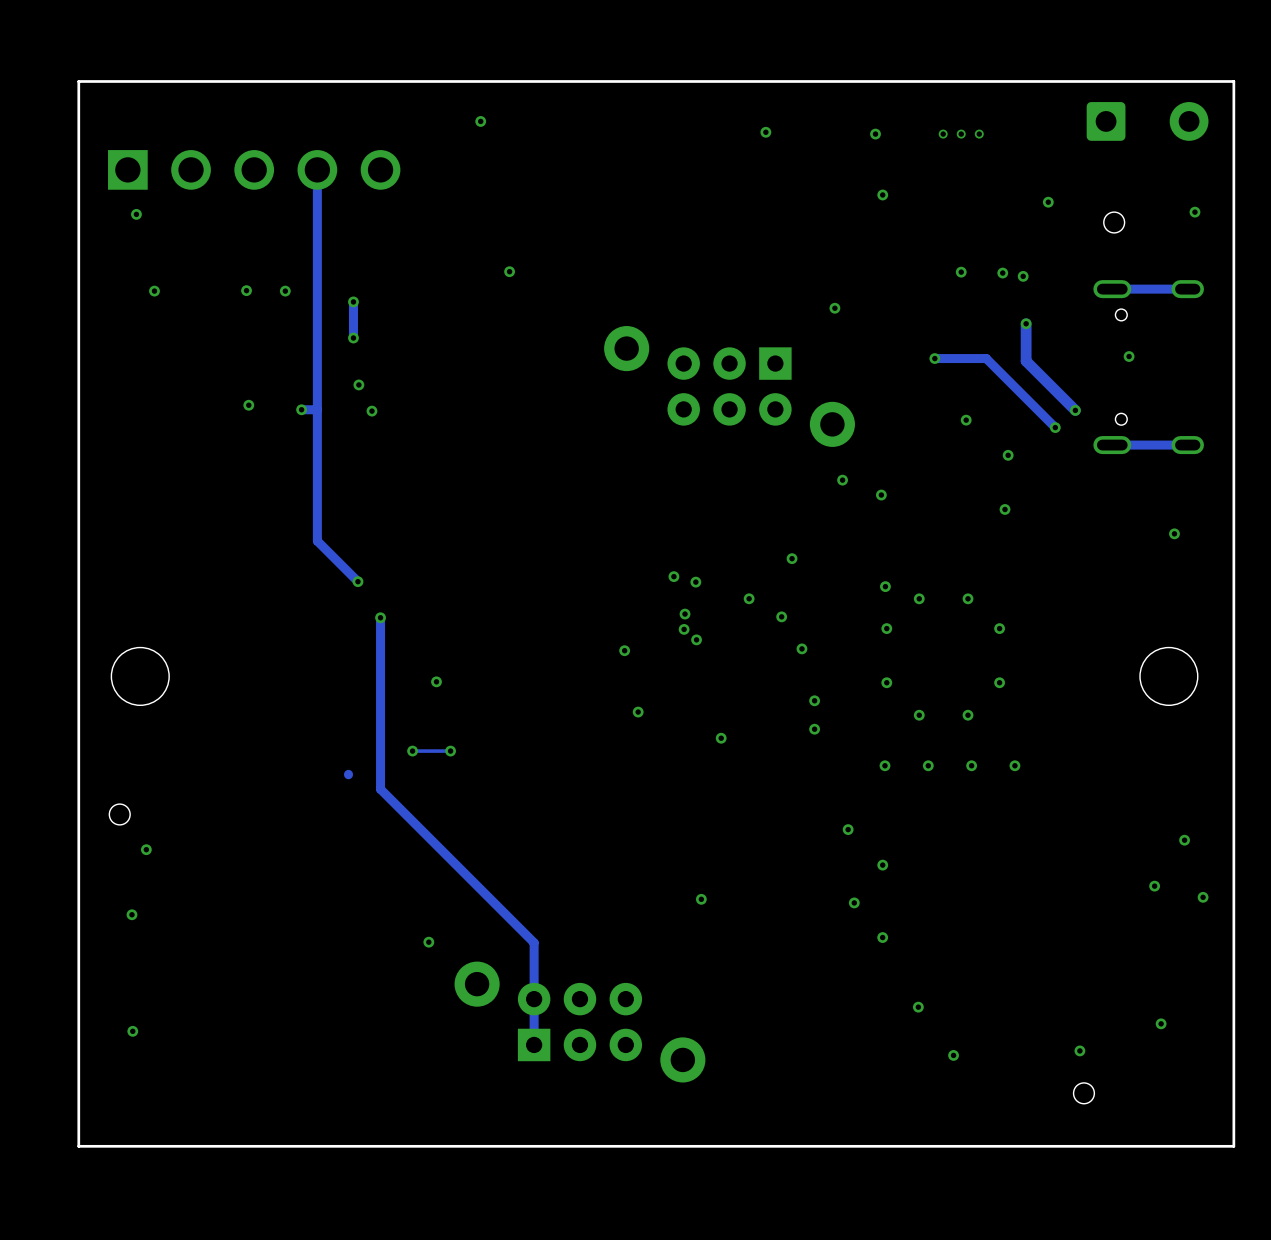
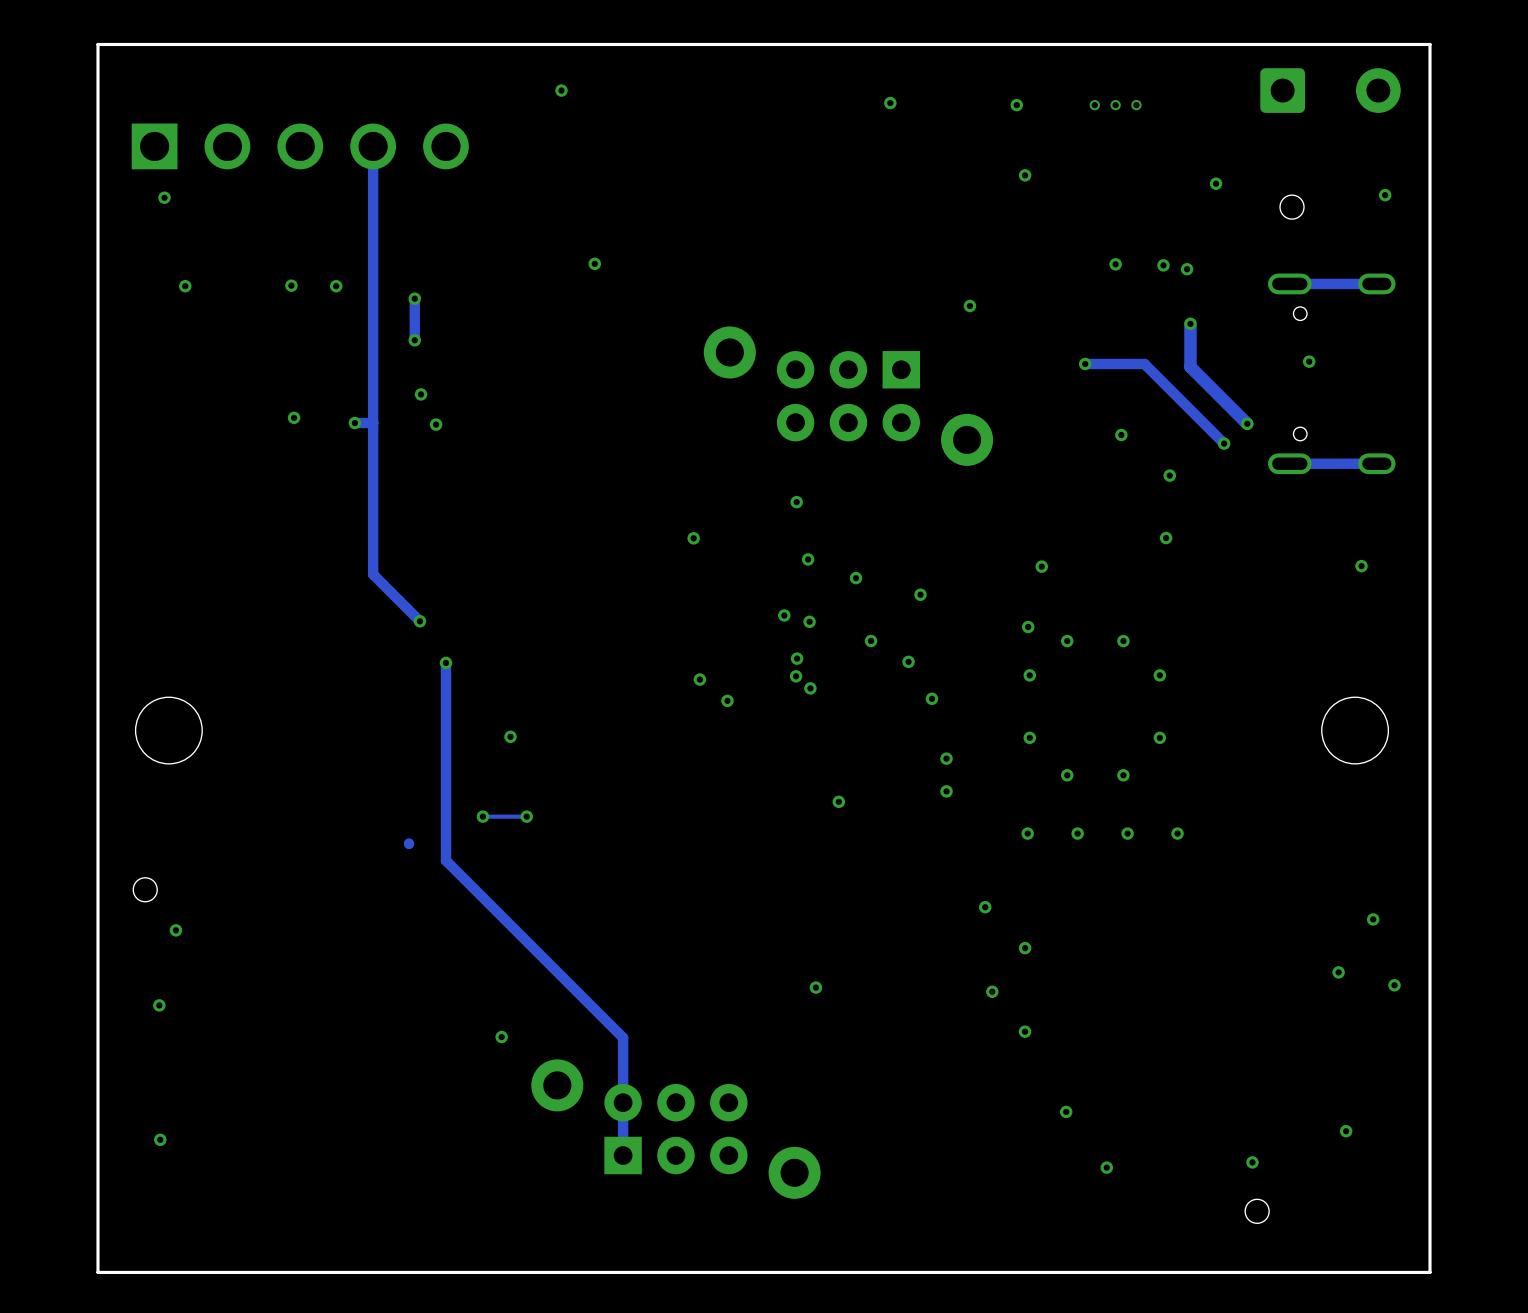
via: none -> (796, 502)
via: (842, 480) -> none
via: (881, 495) -> none
via: none -> (693, 538)
via: none -> (808, 559)
via: none -> (1041, 566)
via: none -> (855, 578)
via position: (638, 712) -> (699, 679)

